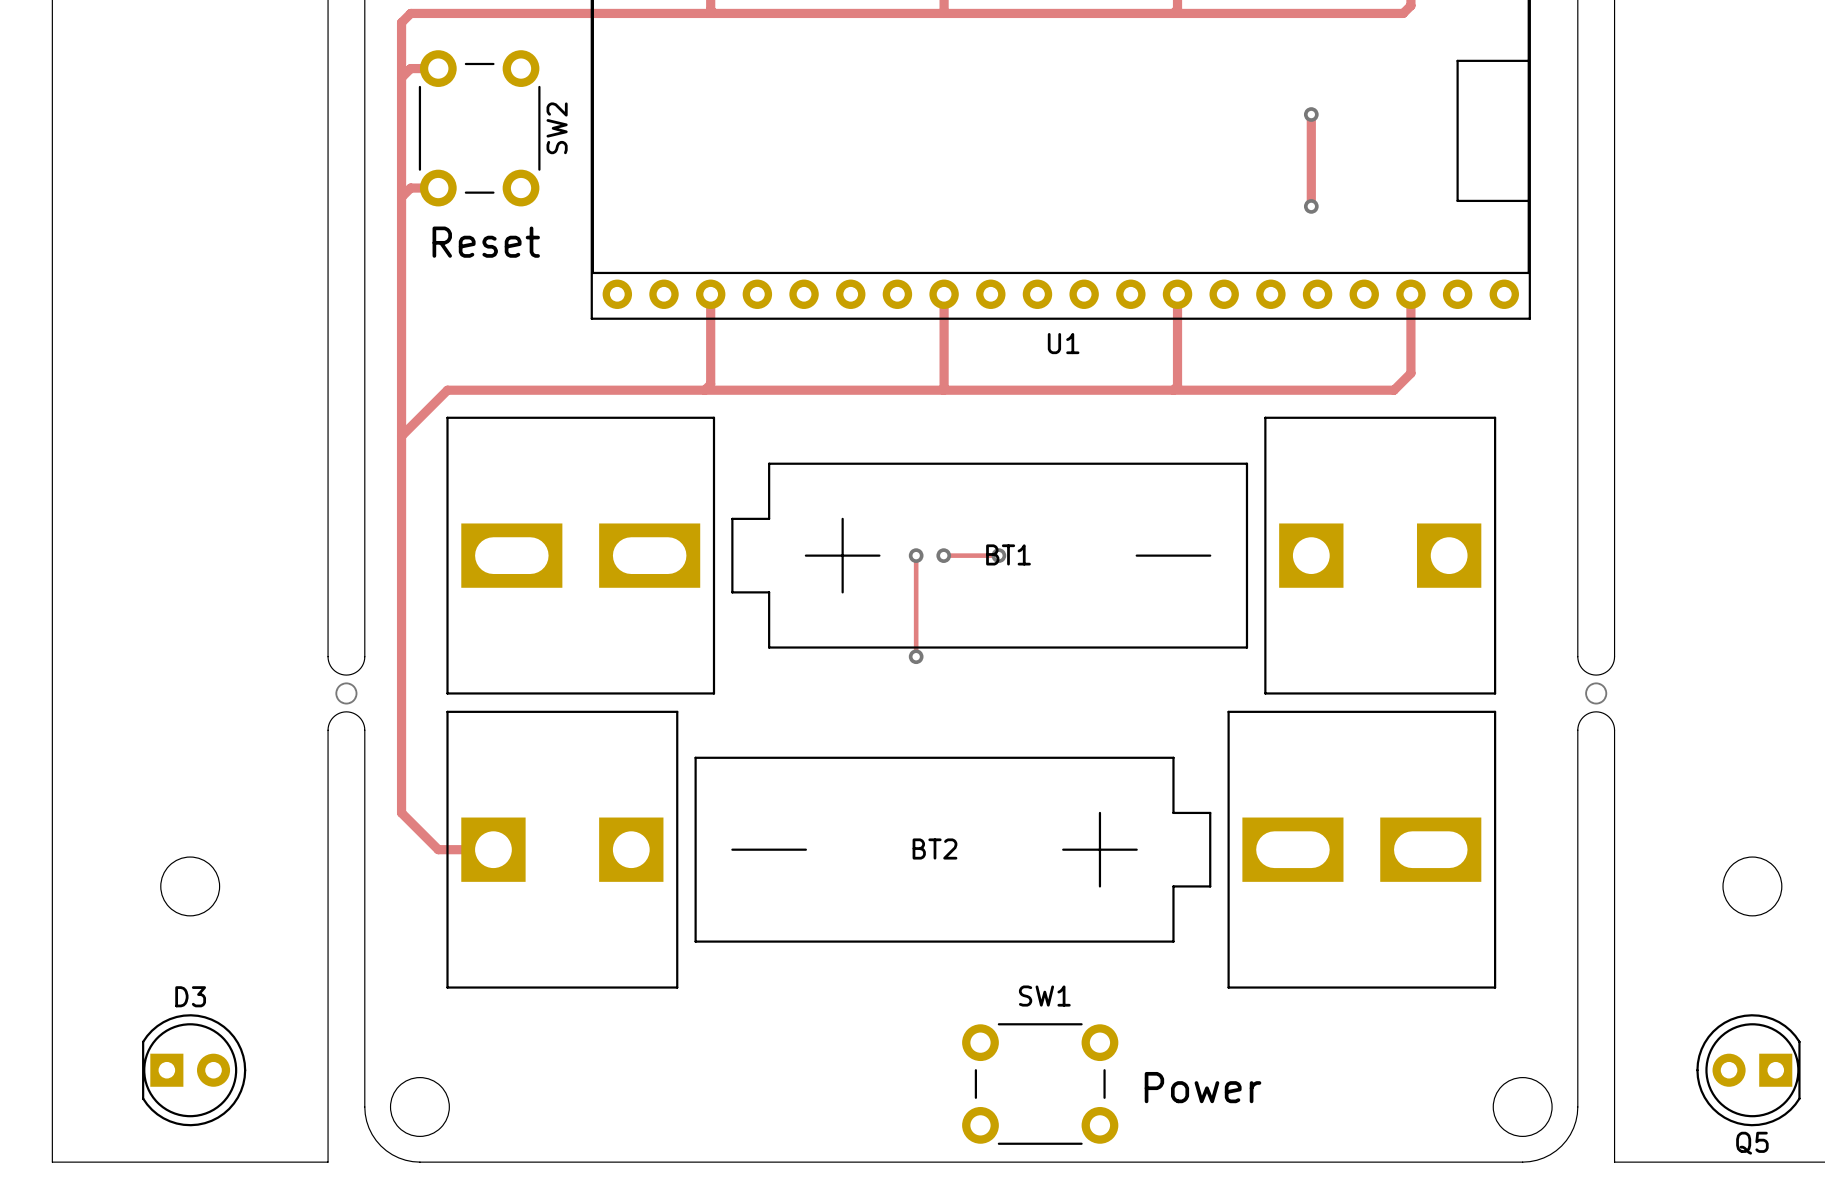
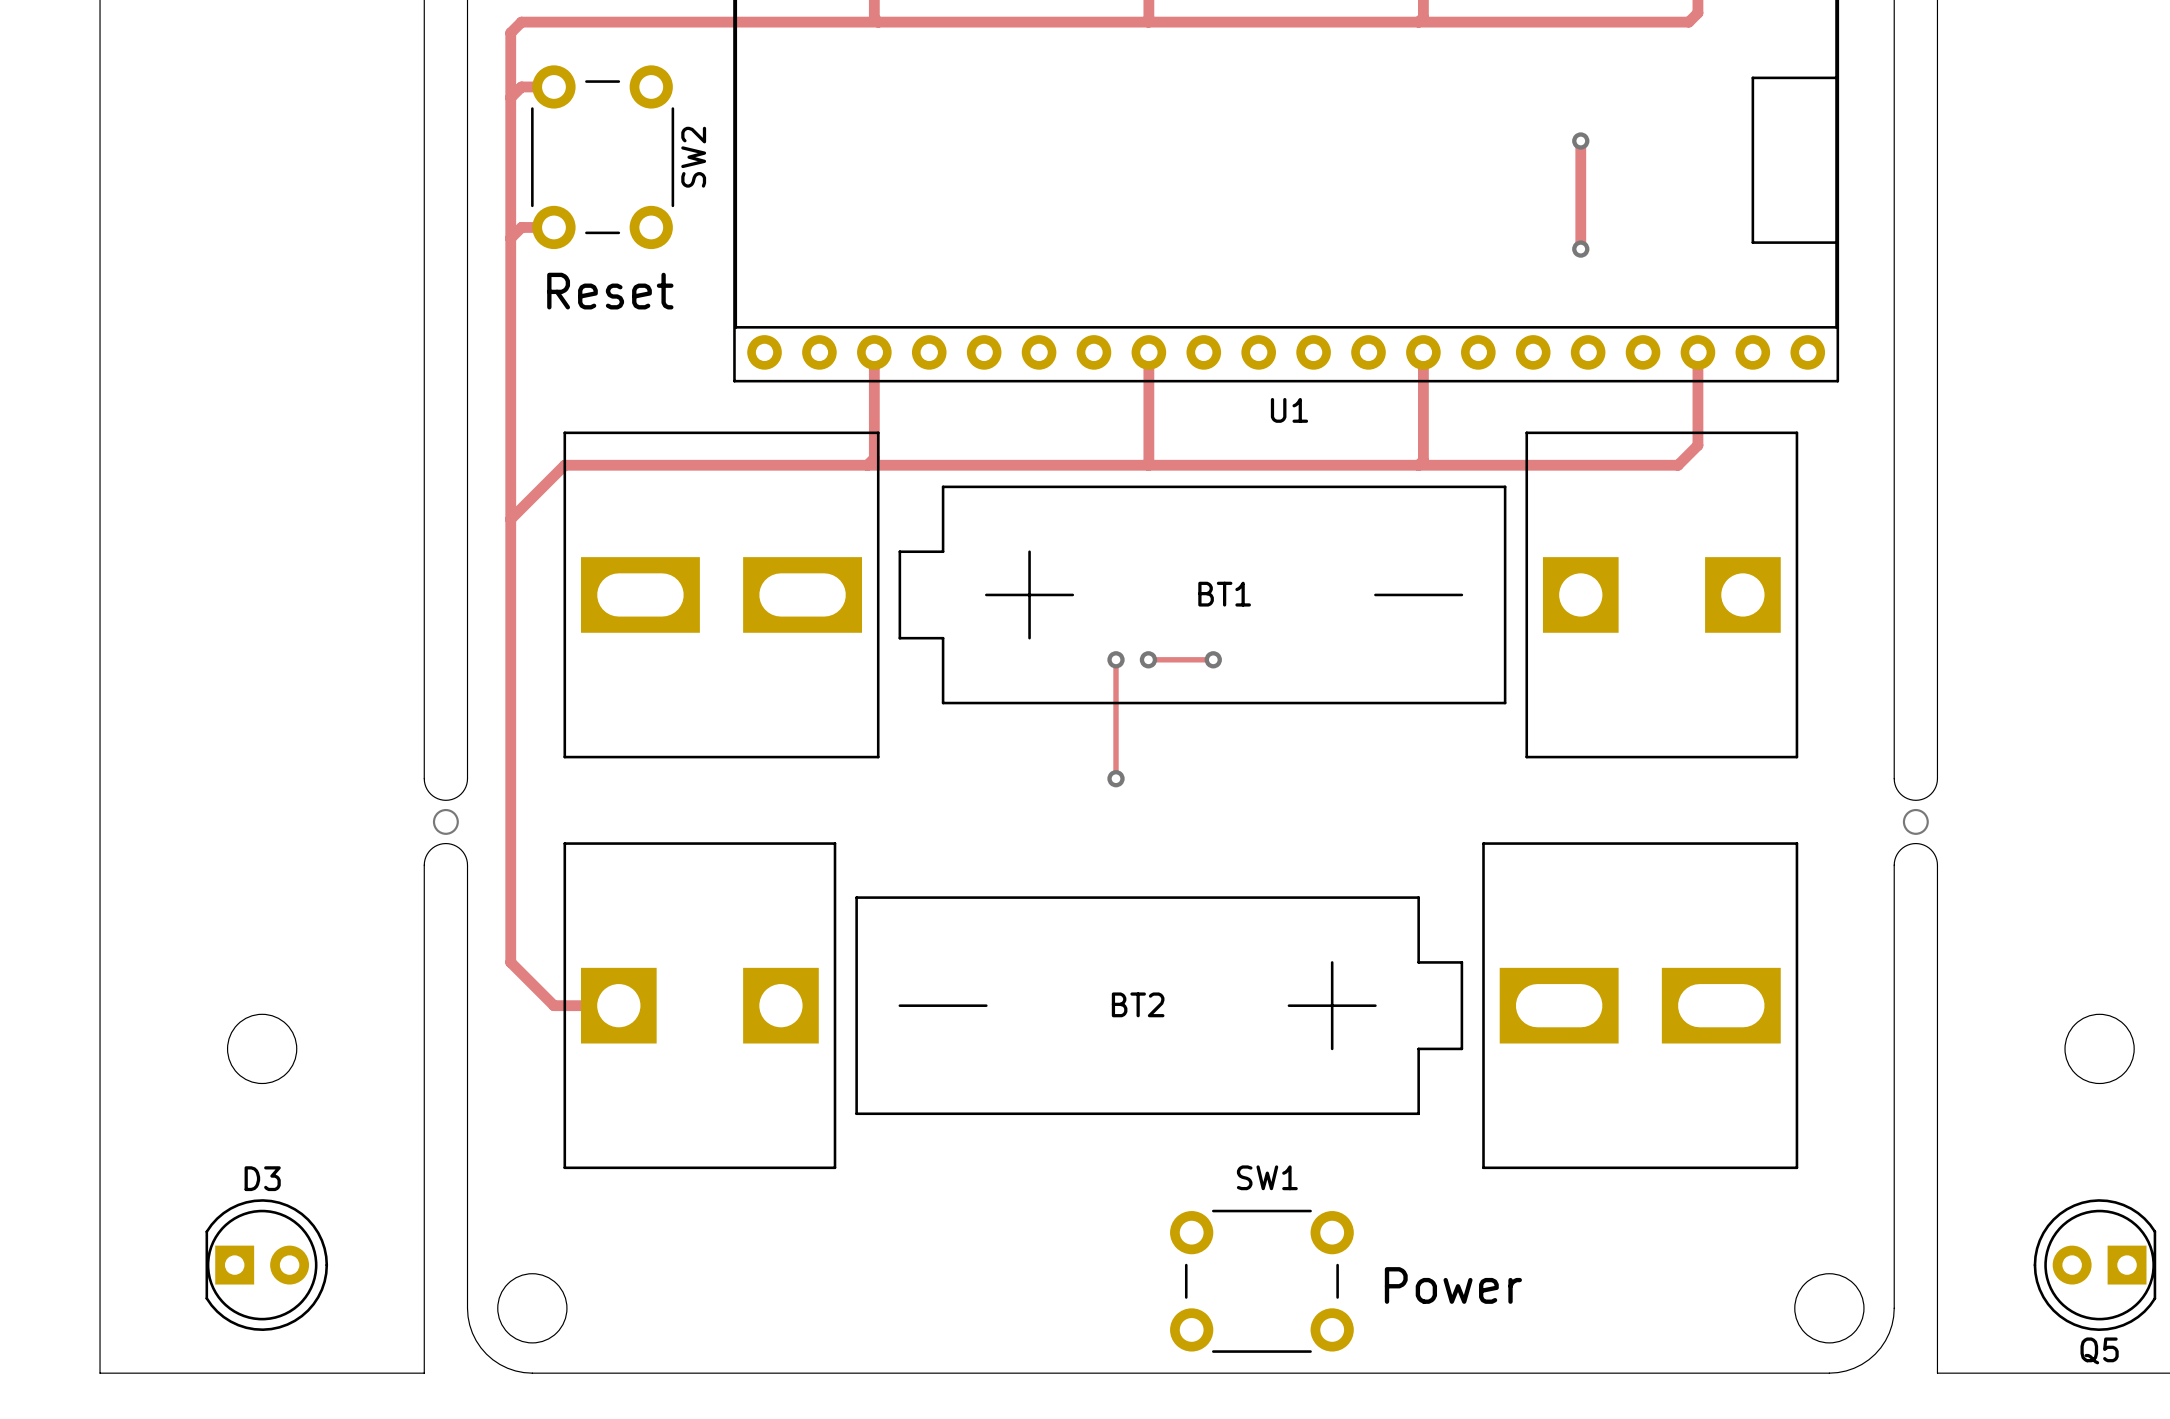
BT1 position: (971, 555) -> (1180, 594)

